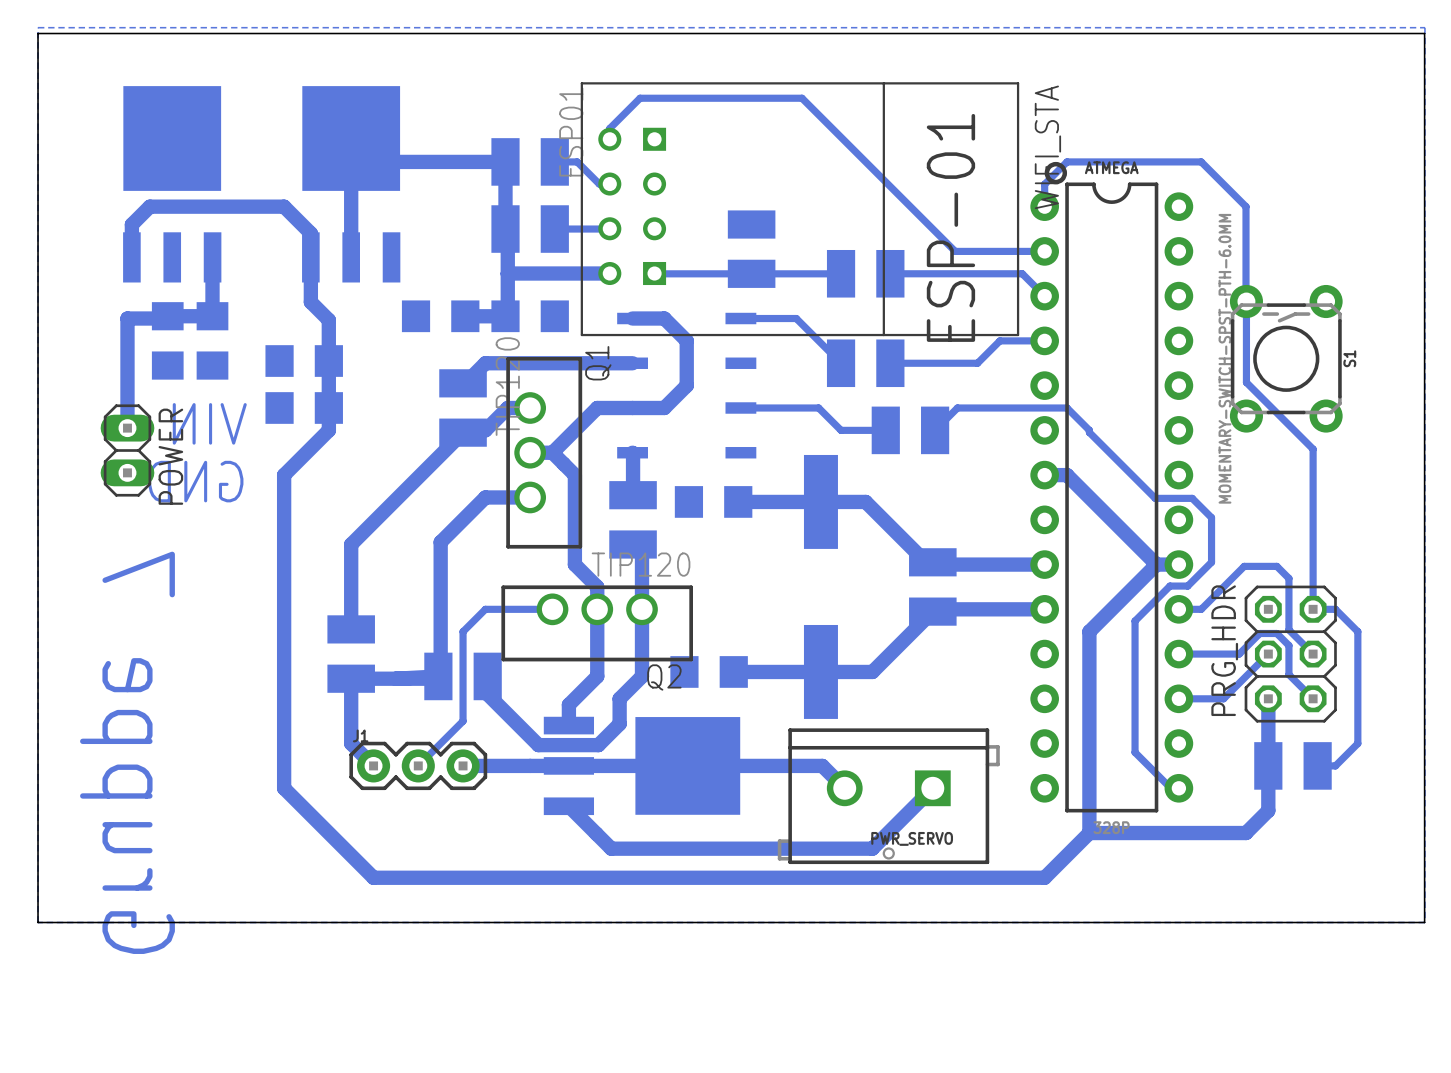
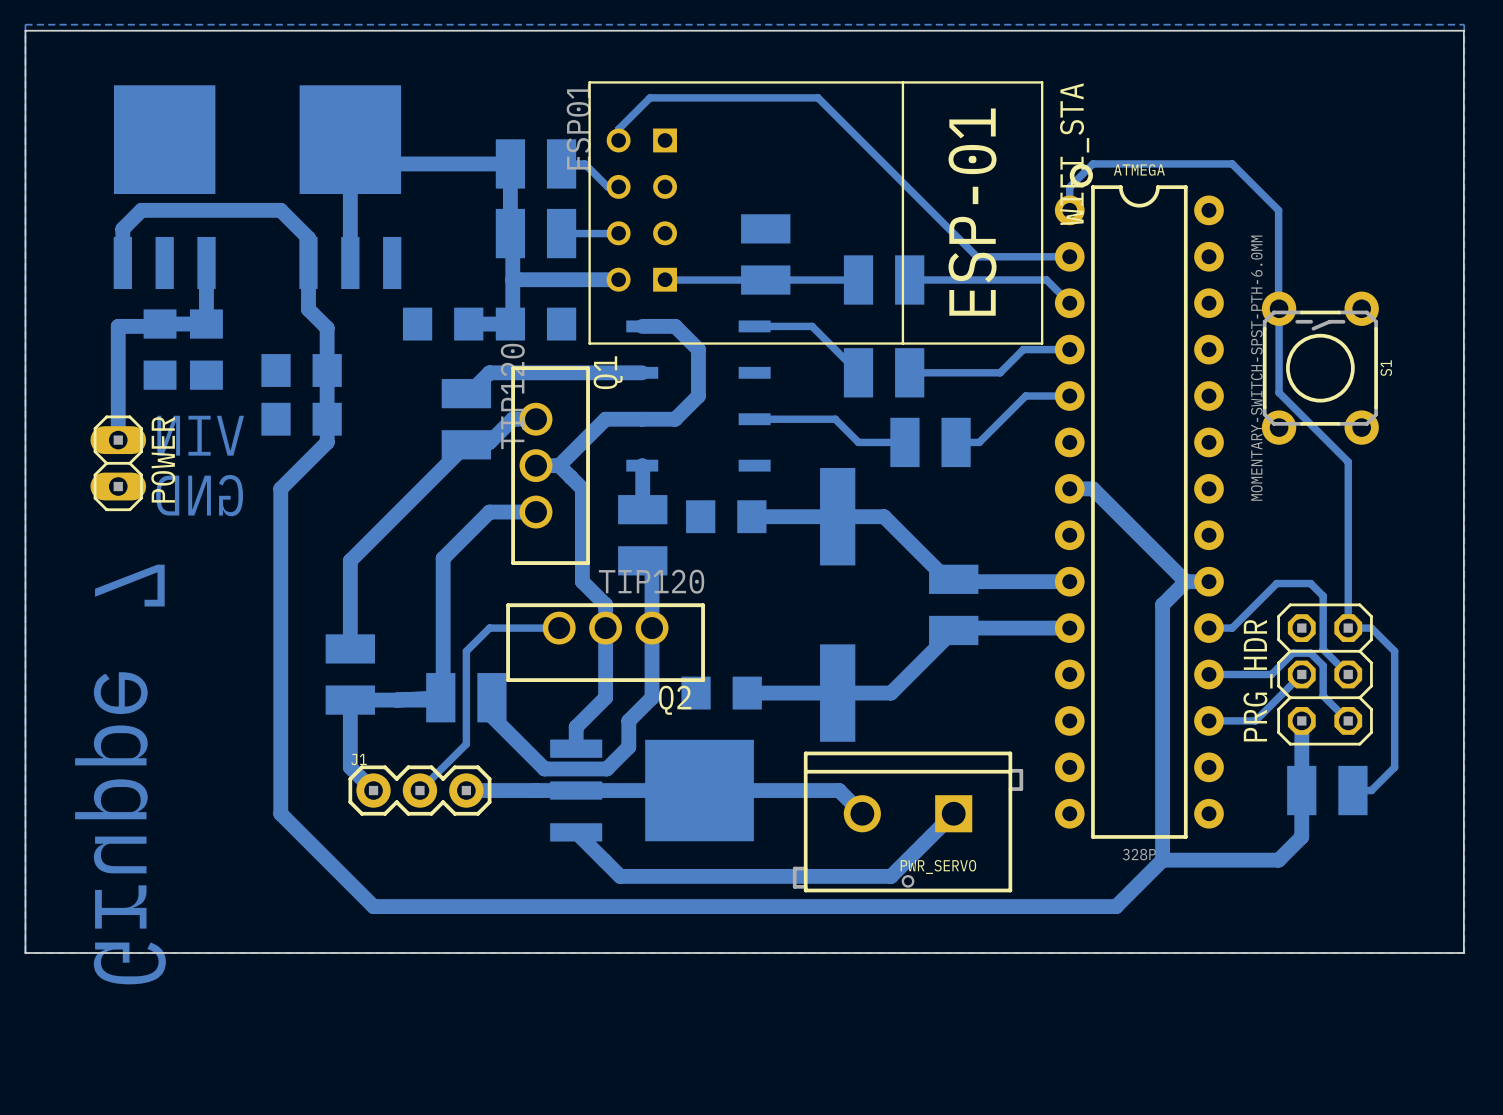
bottom track: (935, 430) (957, 407) (1067, 407) (1155, 498) (1192, 498) (1211, 517) (1211, 562) (1187, 586) (1169, 586) (1135, 621) (1135, 752) (1170, 788) (1178, 788) -> (956, 442) (979, 442) (1025, 396) (1069, 396)
bottom track: (1134, 586) (1089, 631) (1089, 833) -> (1162, 604) (1162, 860) (1116, 906) (1069, 906)
bottom track: (1089, 833) (1134, 833) -> none
bottom track: (1089, 833) (1044, 877) -> none

